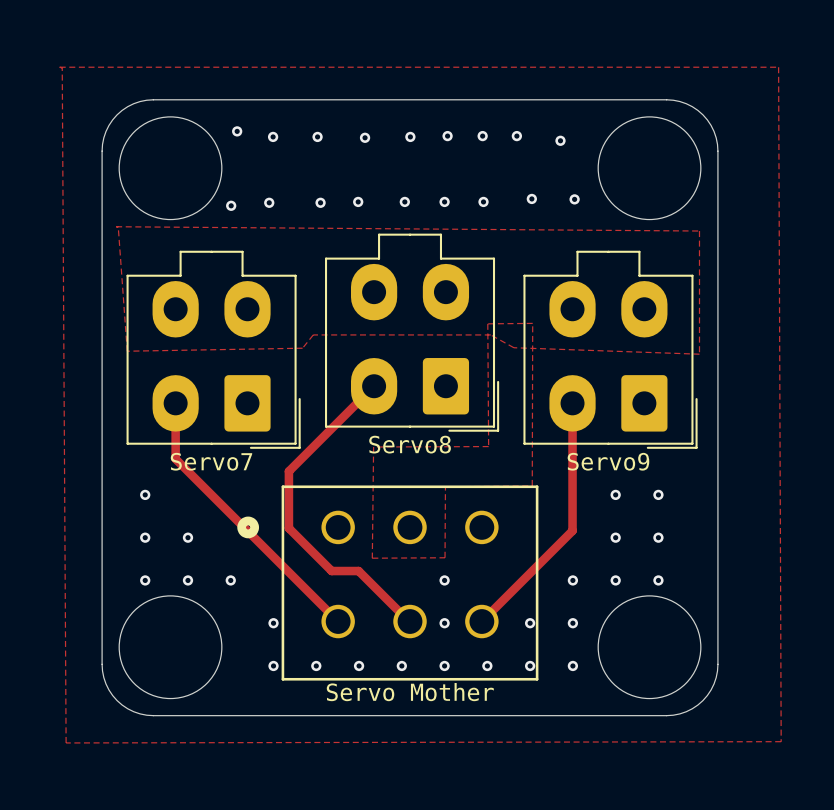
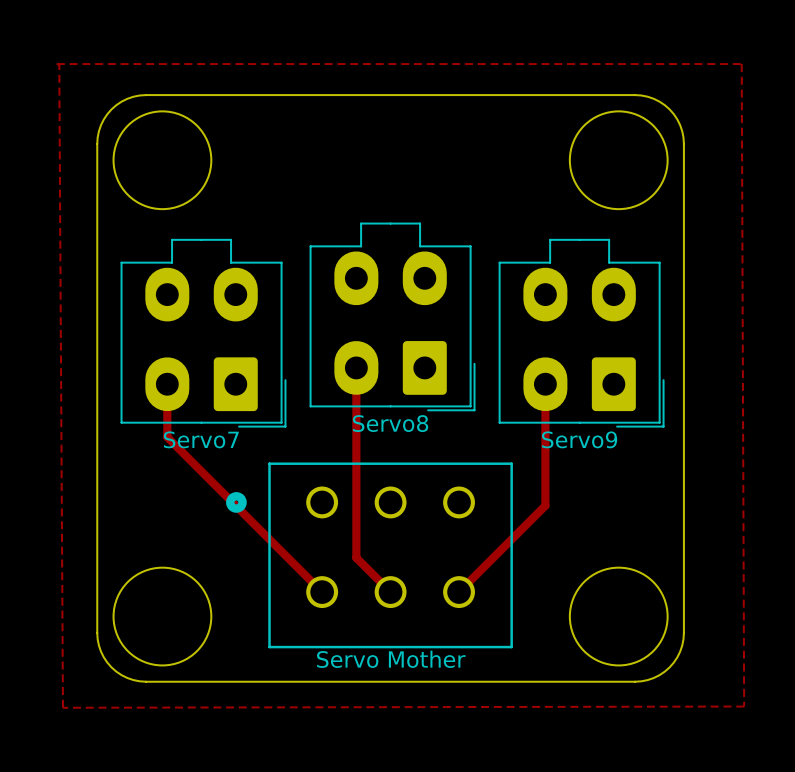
via: (237, 131) -> none
via: (273, 136) -> none
via: (317, 136) -> none
via: (410, 136) -> none
via: (447, 136) -> none
via: (482, 136) -> none
via: (516, 136) -> none
via: (365, 137) -> none
via: (560, 140) -> none
via: (531, 198) -> none
via: (574, 199) -> none
via: (358, 201) -> none
via: (404, 201) -> none
via: (444, 201) -> none
via: (483, 201) -> none
via: (269, 202) -> none
via: (320, 202) -> none
via: (231, 205) -> none
zone outline: (116, 226) (699, 231) (699, 354) (513, 347) (490, 334) (313, 334) (302, 348) (127, 351) (118, 227) (116, 226) -> none
zone outline: (532, 323) (532, 485) (445, 486) (445, 557) (372, 558) (373, 447) (488, 446) (487, 323) (532, 323) -> none
track: (374, 386) (288, 471) (288, 528) (331, 571) (358, 571) (410, 621) -> (356, 367) (356, 557) (390, 592)
via: (145, 494) -> none
via: (615, 494) -> none
via: (658, 494) -> none
via: (145, 537) -> none
via: (187, 537) -> none
via: (615, 537) -> none
via: (658, 537) -> none
via: (145, 580) -> none
via: (187, 580) -> none
via: (230, 580) -> none
via: (444, 580) -> none
via: (572, 580) -> none
via: (615, 580) -> none
via: (658, 580) -> none
via: (273, 623) -> none
via: (444, 623) -> none
via: (530, 623) -> none
via: (572, 623) -> none
via: (273, 665) -> none
via: (316, 665) -> none
via: (359, 665) -> none
via: (401, 665) -> none
via: (444, 665) -> none
via: (487, 665) -> none
via: (530, 665) -> none
via: (572, 665) -> none

